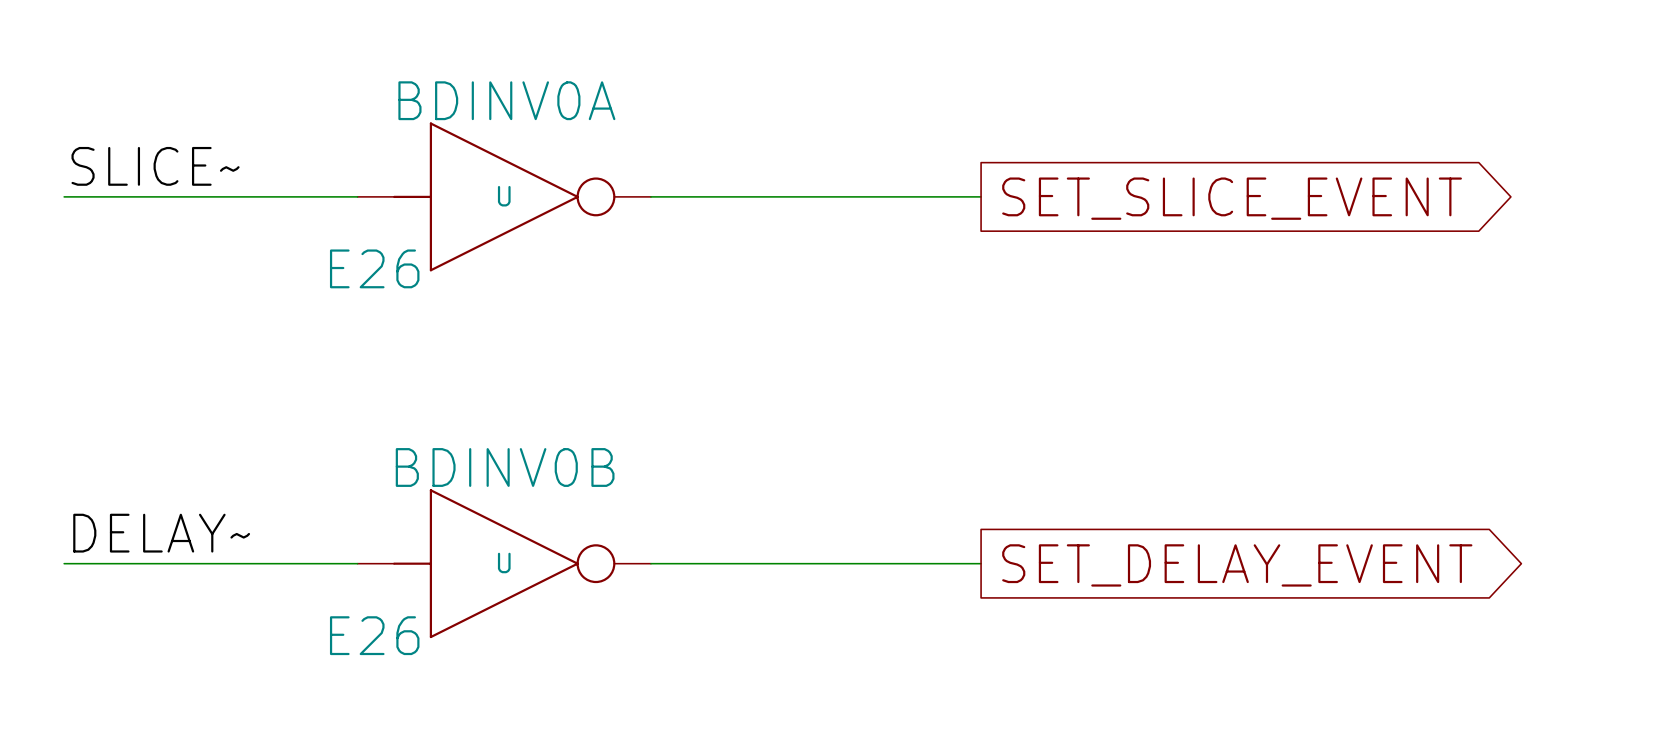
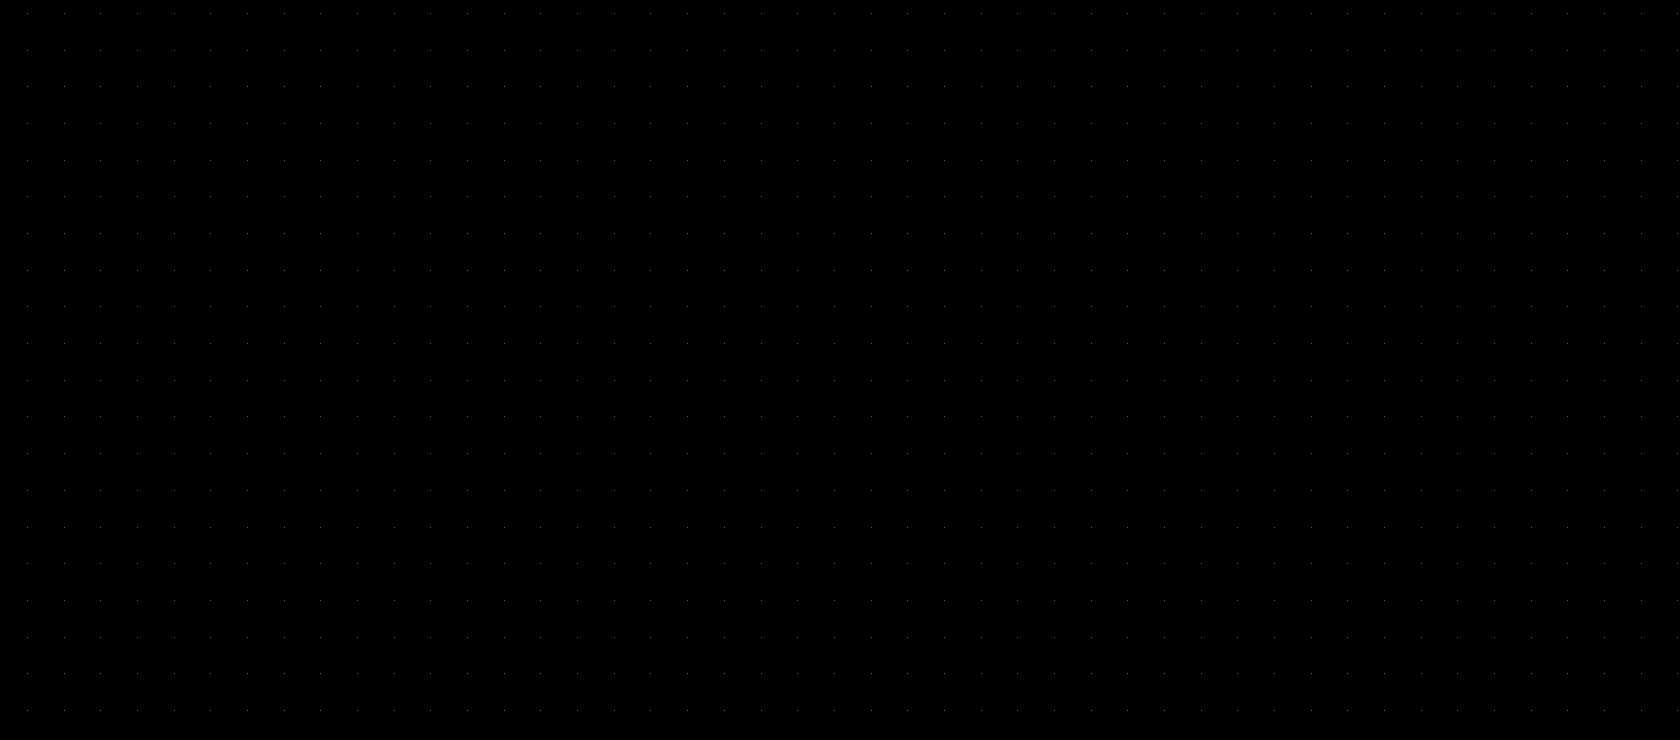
label: SLICE~ (155, 166) -> none
wire: (64, 196) (357, 196) -> none
U: (504, 196) -> none
wire: (650, 196) (981, 196) -> none
global label: SET_SLICE_EVENT (1232, 198) -> none
label: DELAY~ (161, 533) -> none
wire: (64, 563) (357, 563) -> none
U: (504, 563) -> none
wire: (650, 563) (981, 563) -> none
global label: SET_DELAY_EVENT (1237, 565) -> none

